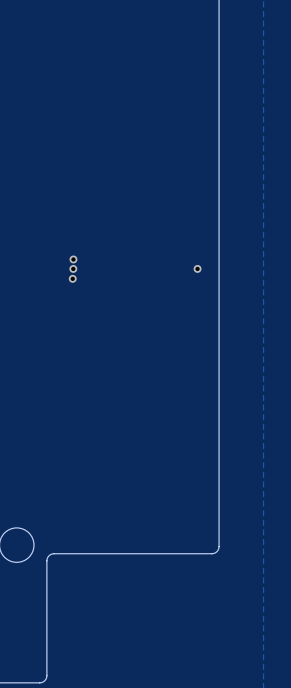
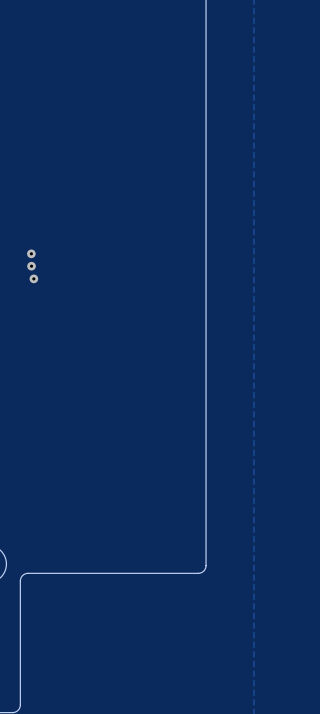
via: none -> (31, 253)
via: (73, 259) -> none
via: none -> (31, 266)
via: (73, 268) -> none
via: (197, 268) -> none
via: (72, 278) -> none
via: none -> (33, 278)

